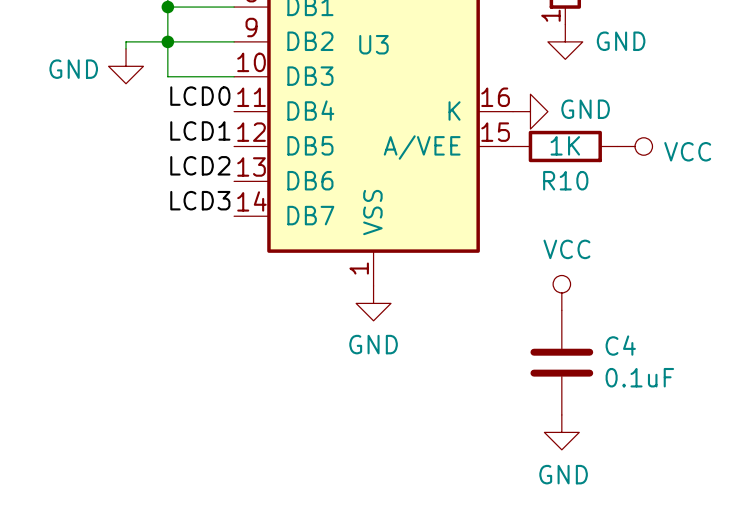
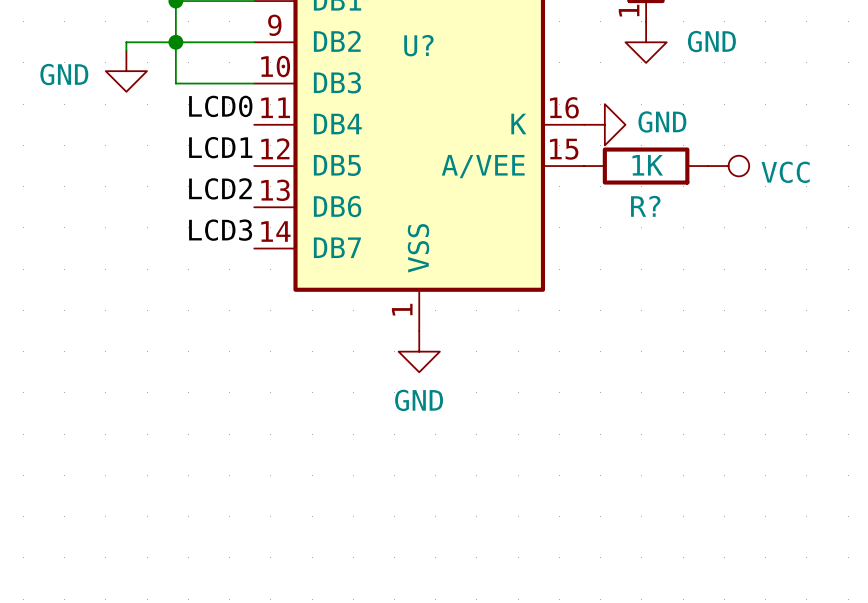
U3 name: U3 (373, 44) -> U? (418, 45)
R10 name: R10 (565, 180) -> R? (645, 206)
power symbol: VCC (561, 292) -> none
C4: 0.1uF (561, 362) -> none
power symbol: GND (561, 432) -> none

